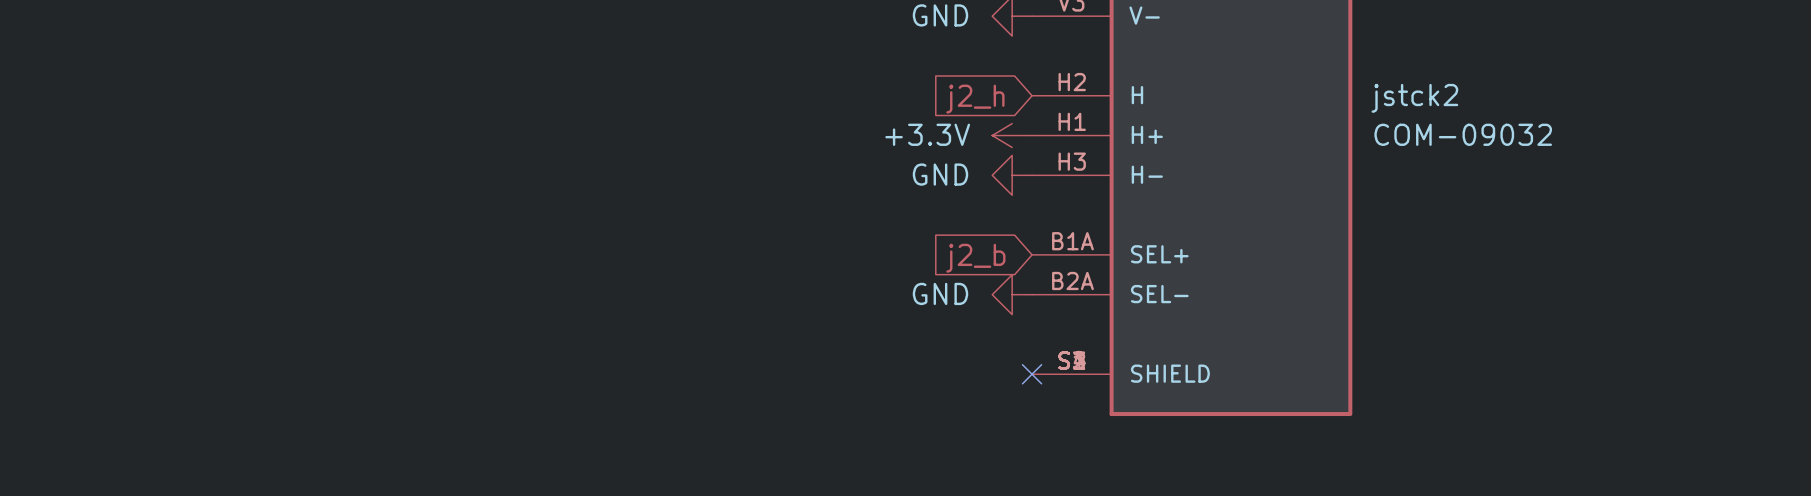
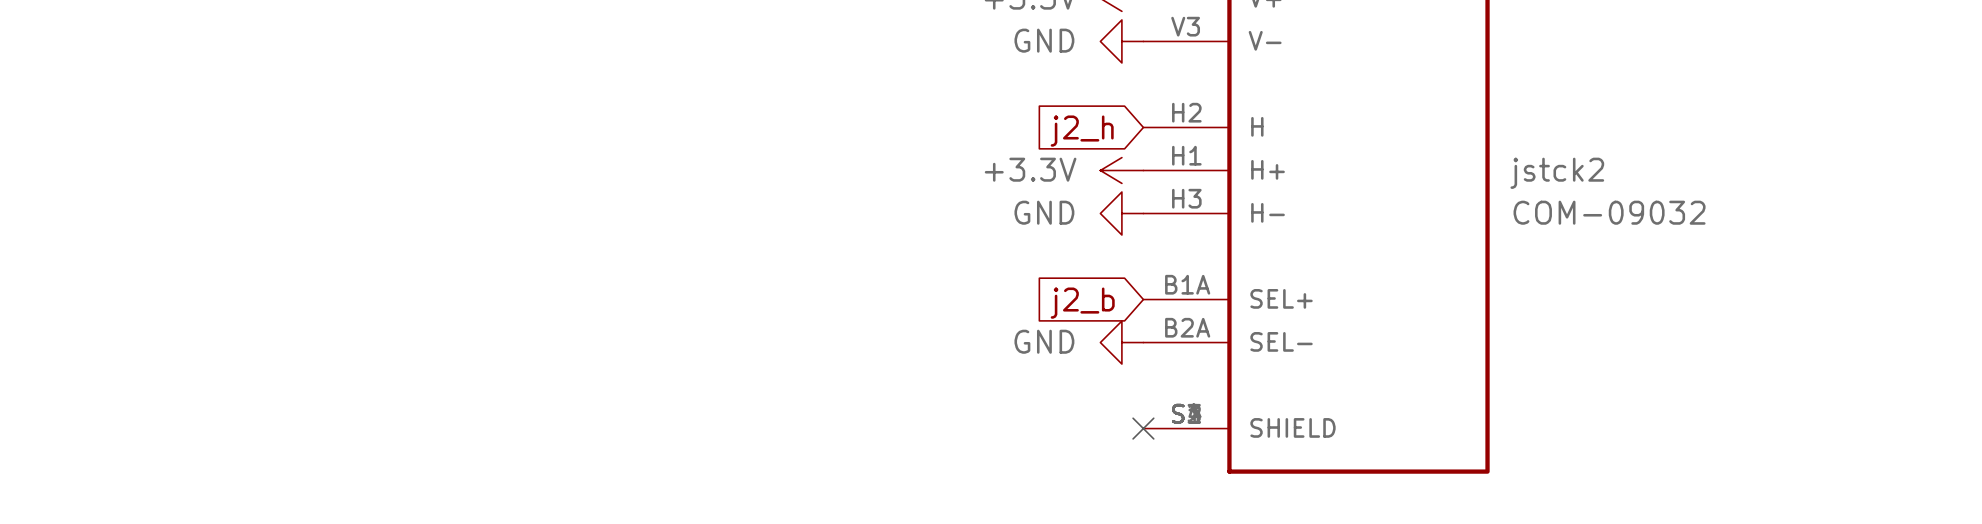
jstck2 name position: jstck2 (1414, 98) -> jstck2 (1557, 173)
jstck2 value position: COM-09032 (1463, 134) -> COM-09032 (1609, 212)

